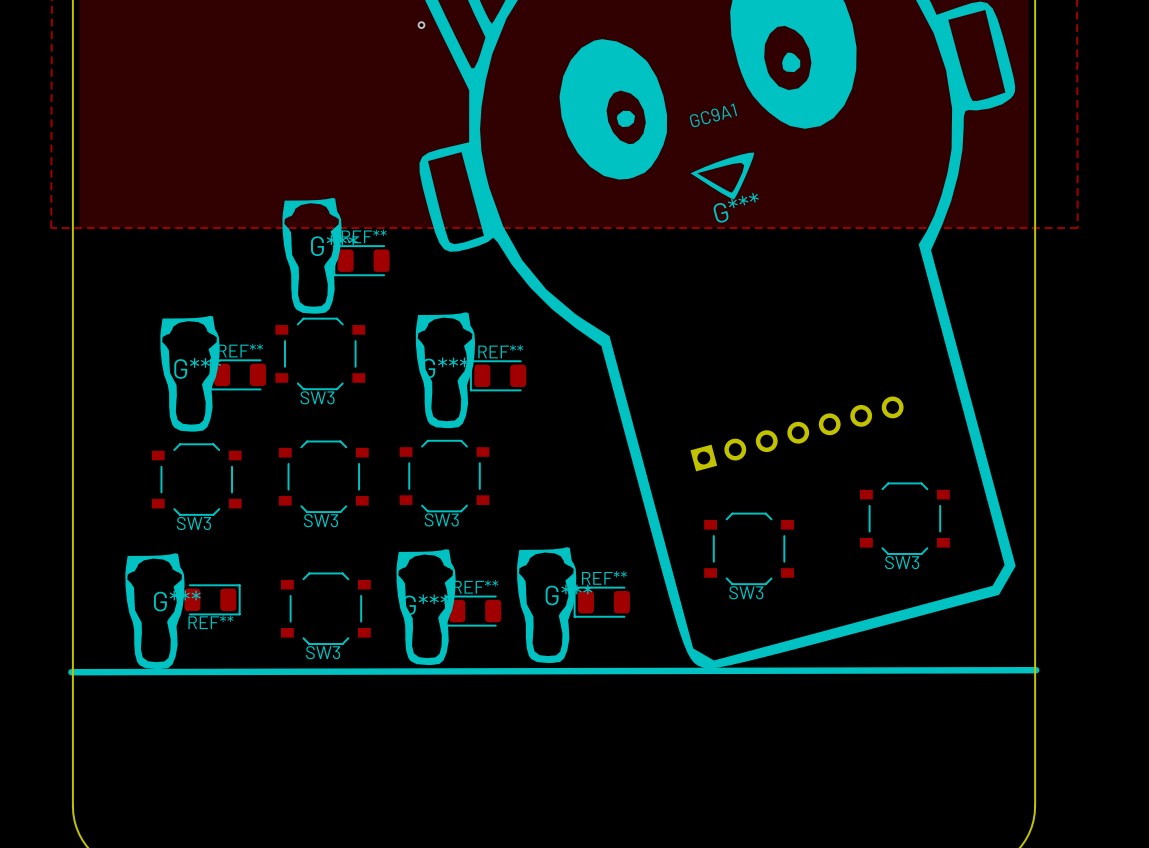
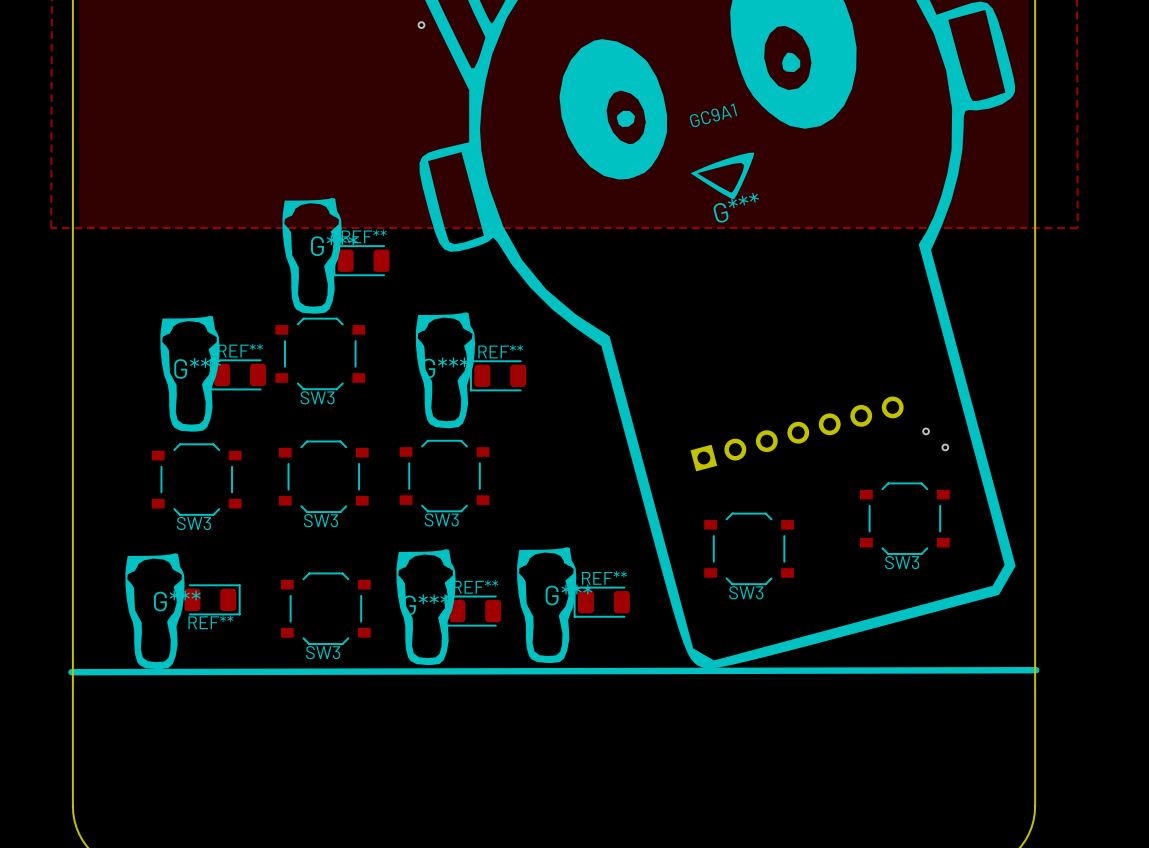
via: none -> (926, 431)
via: none -> (945, 447)

